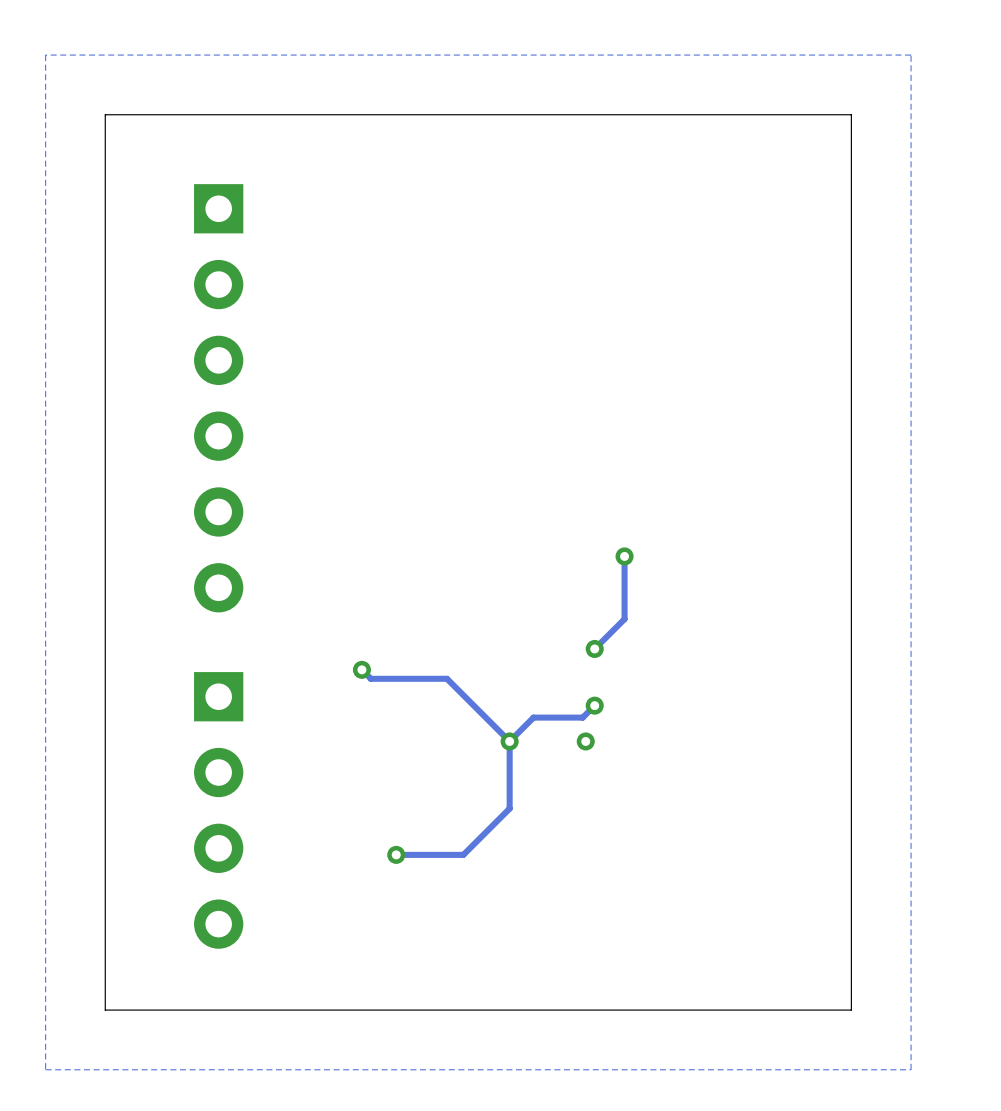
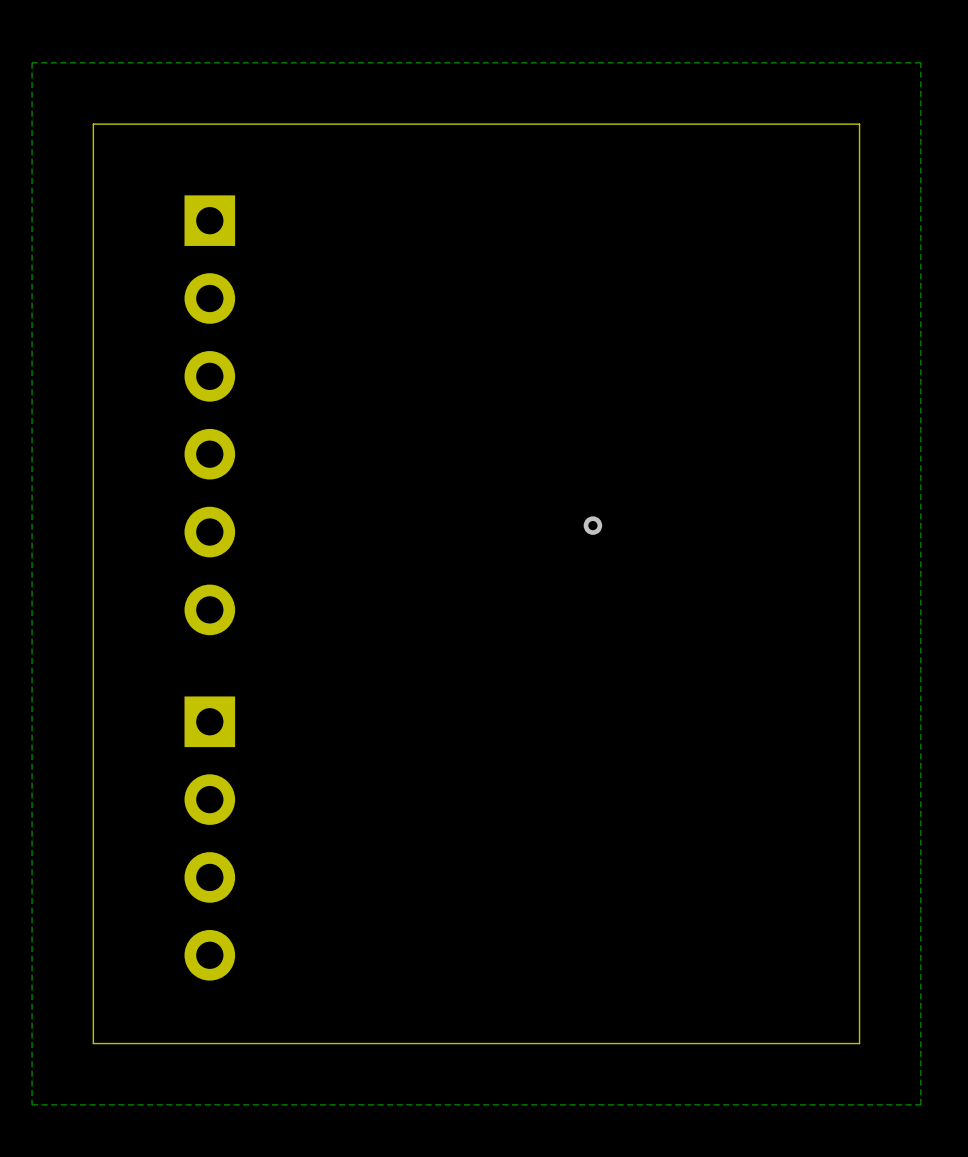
track: (624, 556) (624, 619) (594, 648) -> none
via position: (624, 556) -> (592, 525)
via: (594, 648) -> none
track: (361, 669) (370, 678) (446, 678) (509, 741) -> none
via: (361, 669) -> none
track: (594, 705) (582, 717) (533, 717) (509, 741) -> none
via: (594, 705) -> none
track: (509, 741) (509, 808) (463, 854) (396, 854) -> none
via: (509, 741) -> none
via: (585, 741) -> none
via: (396, 854) -> none

